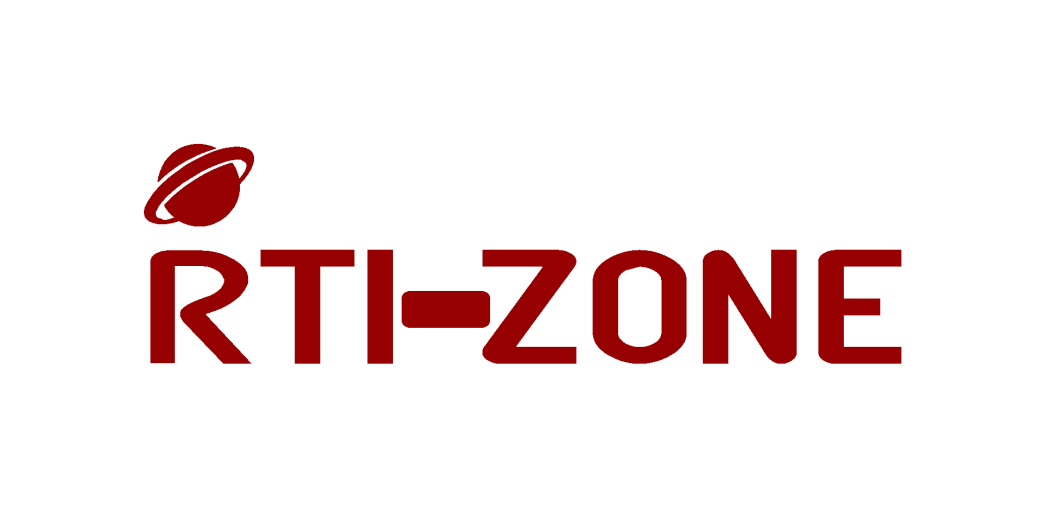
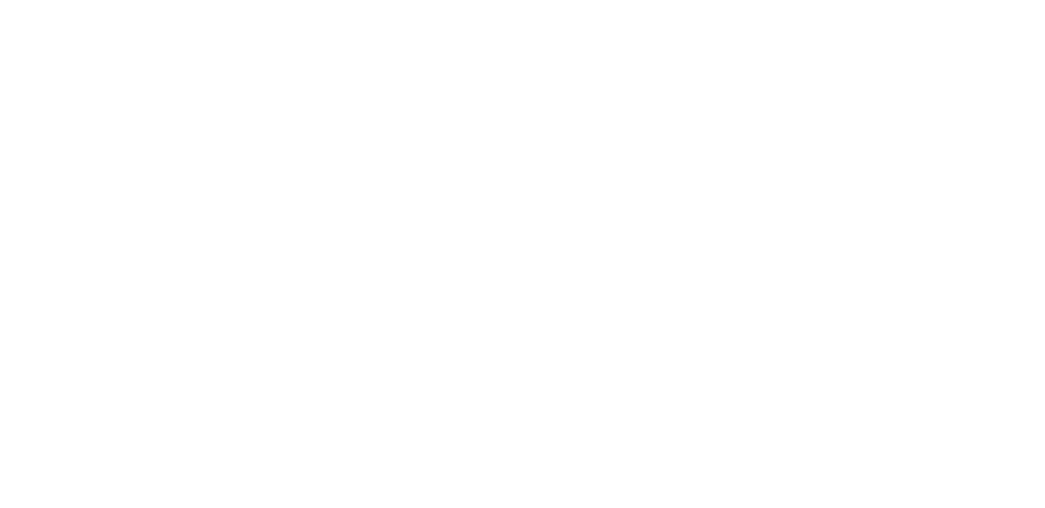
part: (522, 253) -> none

